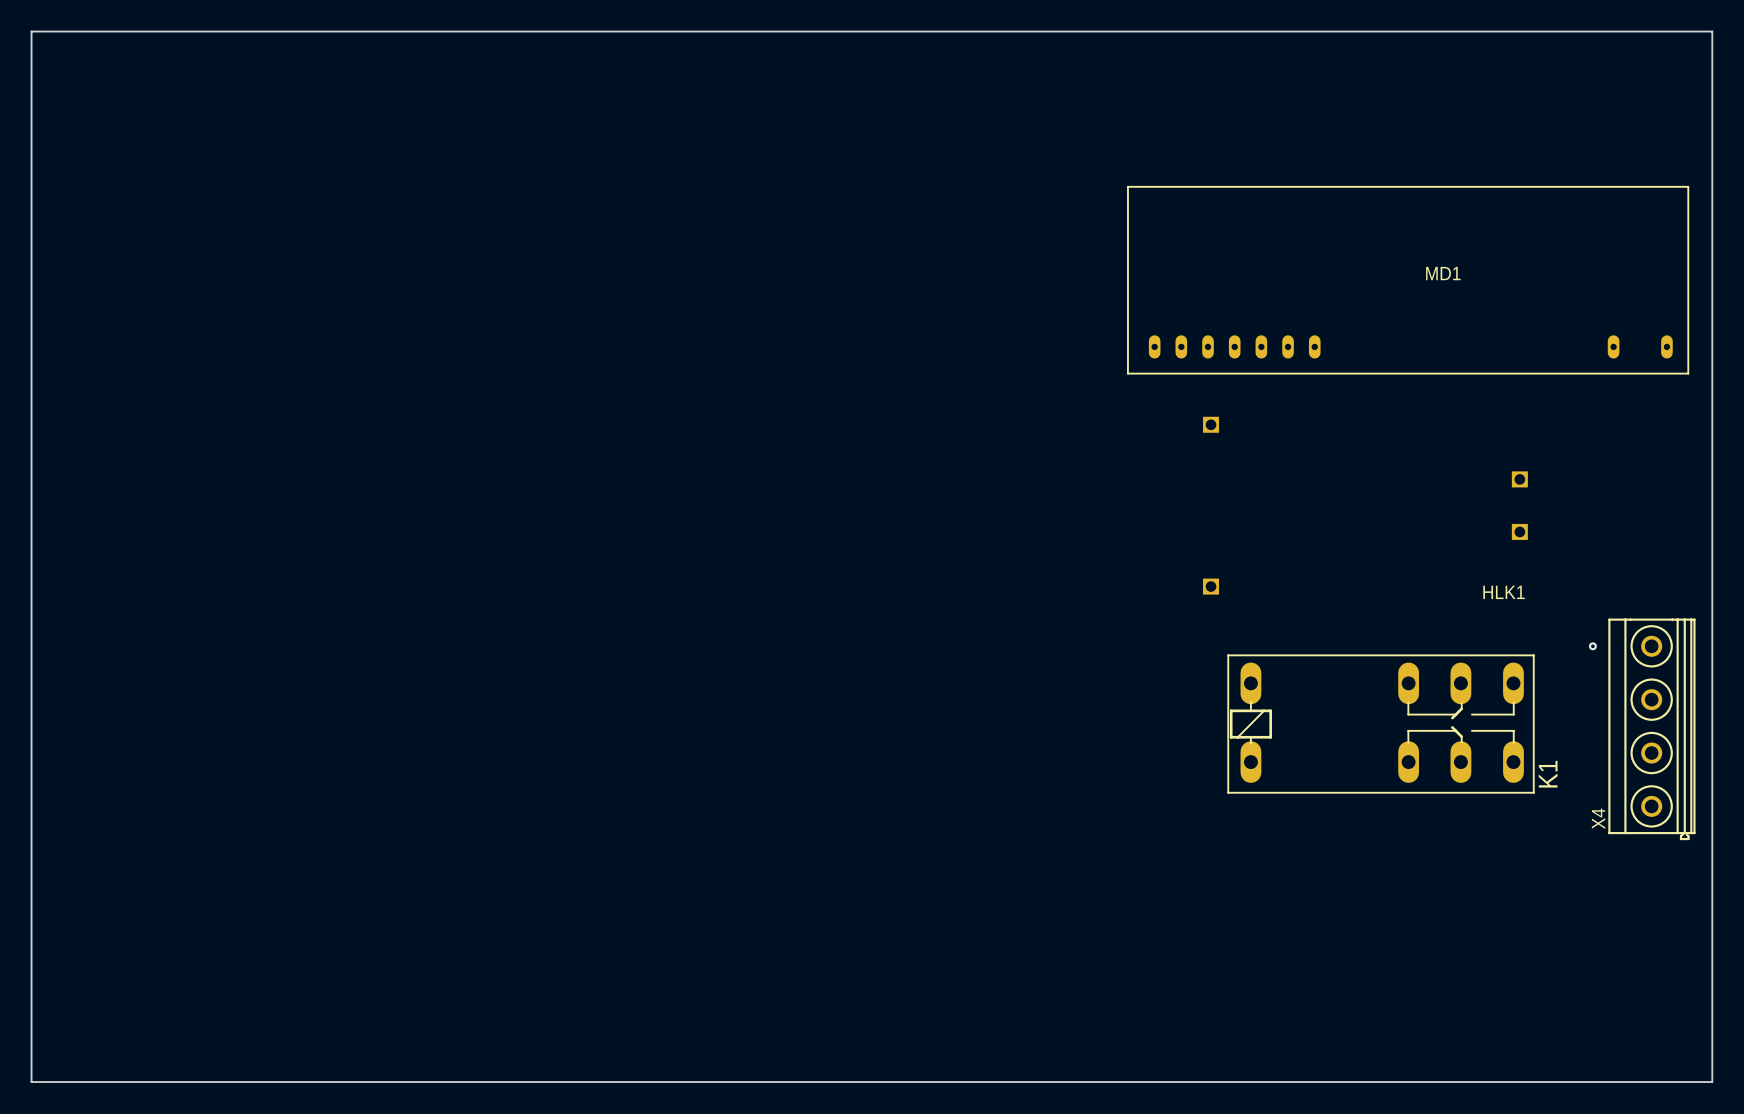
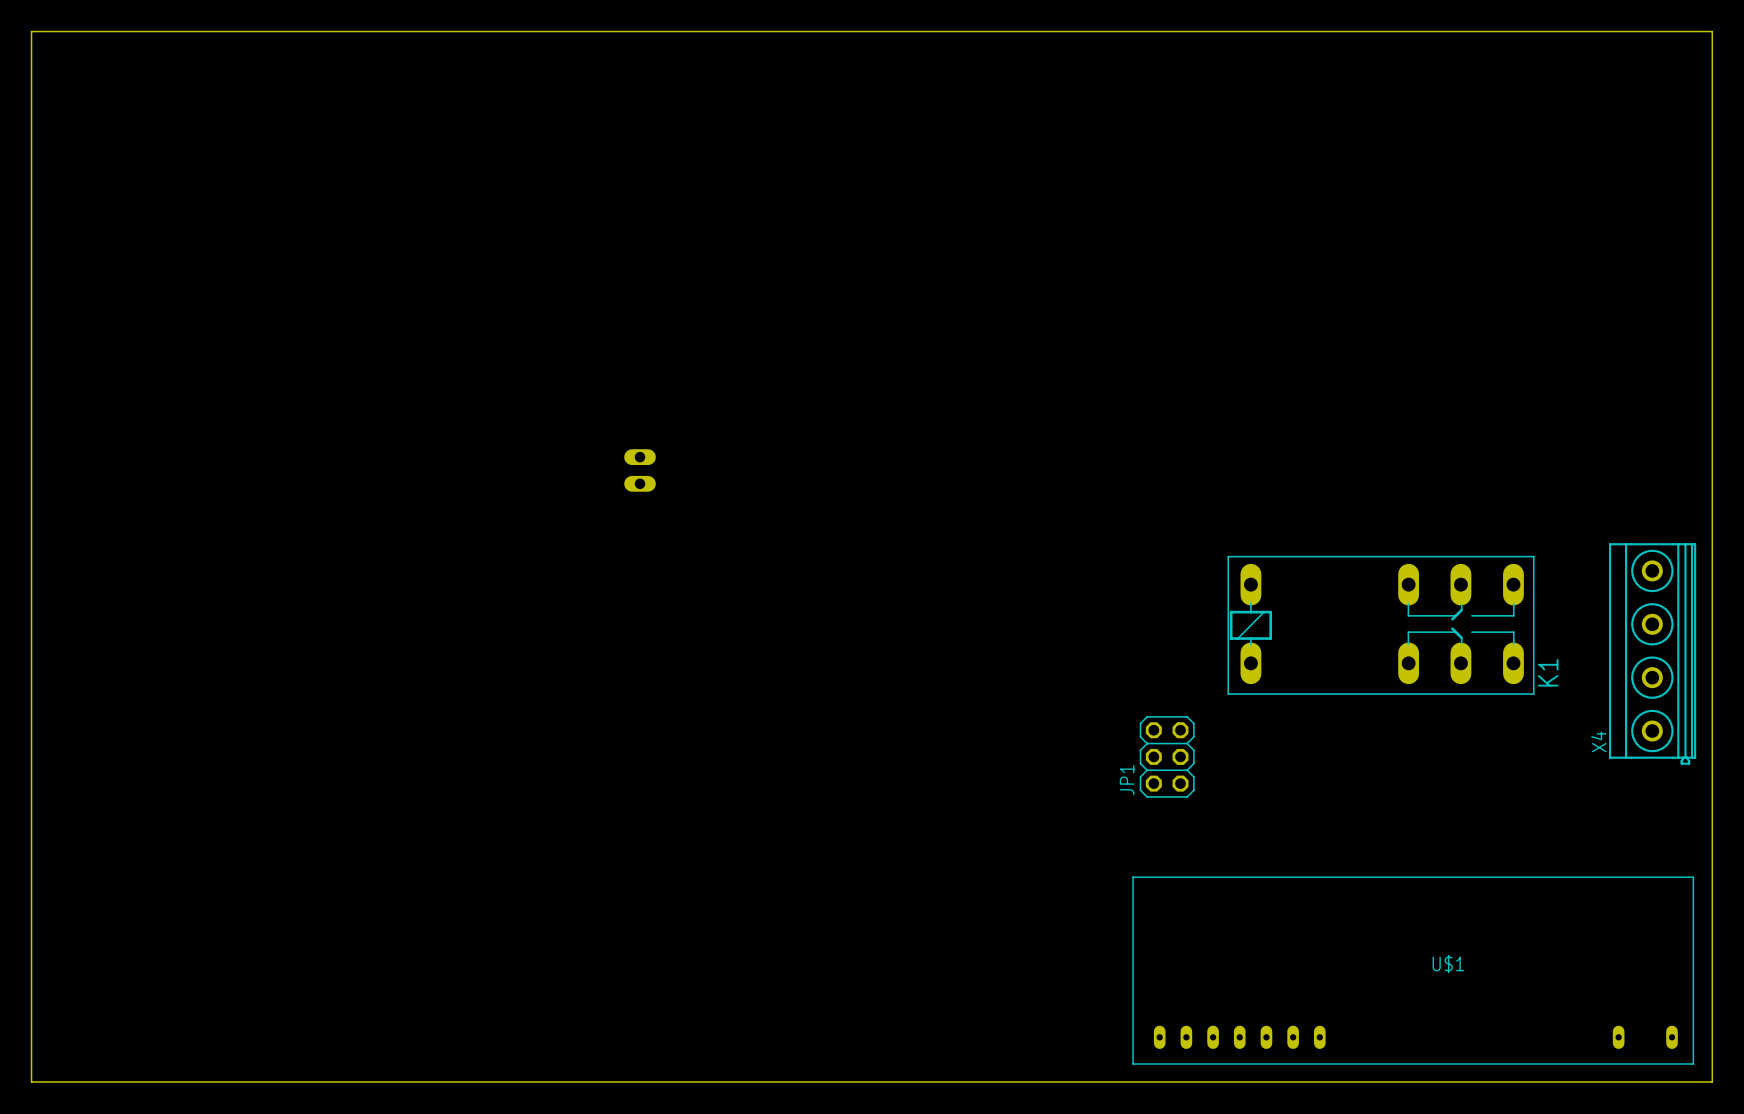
MD1: (1408, 280) -> none
part: none -> (640, 470)
HLK1: (1365, 505) -> none
via: (1592, 646) -> none
K1 position: (1381, 724) -> (1381, 625)
X4 position: (1651, 729) -> (1652, 653)
JP1: none -> (1167, 756)
U$1: none -> (1413, 970)

